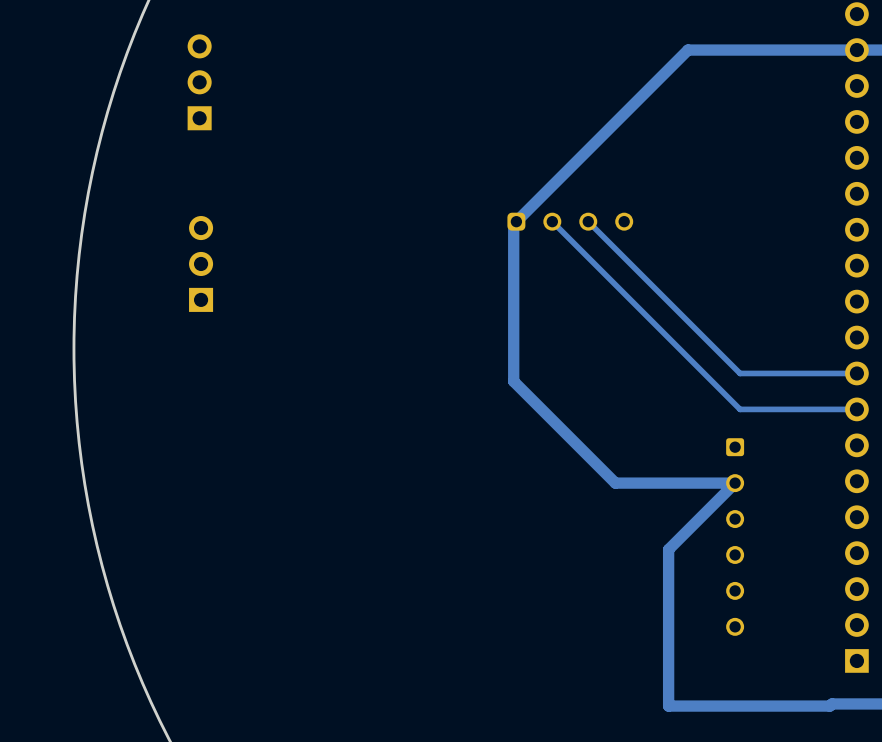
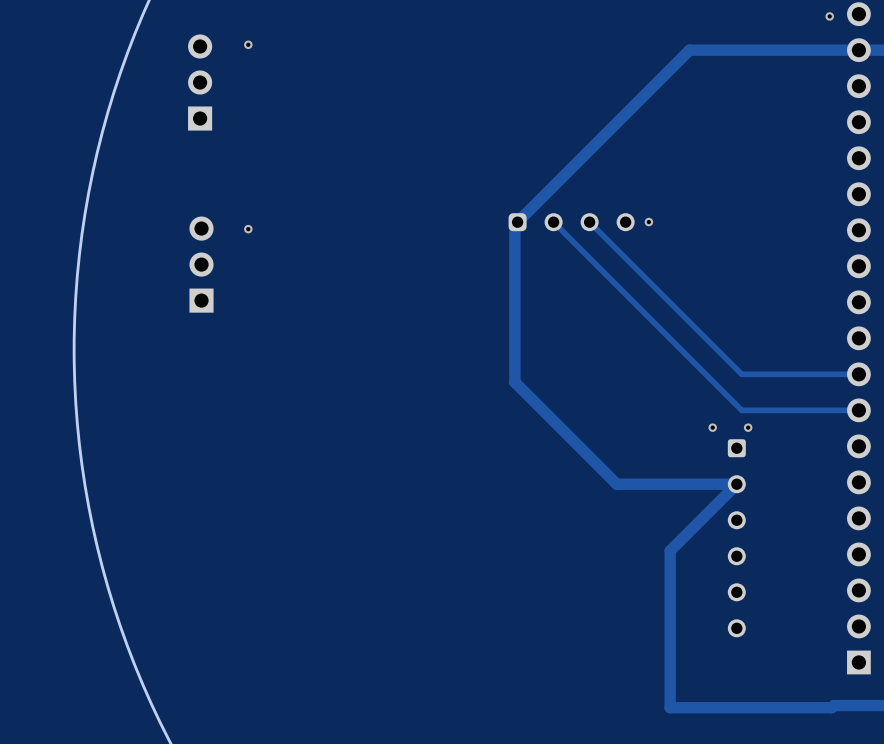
via: none -> (829, 16)
via: none -> (248, 44)
via: none -> (648, 222)
via: none -> (248, 229)
via: none -> (712, 427)
via: none -> (748, 427)

